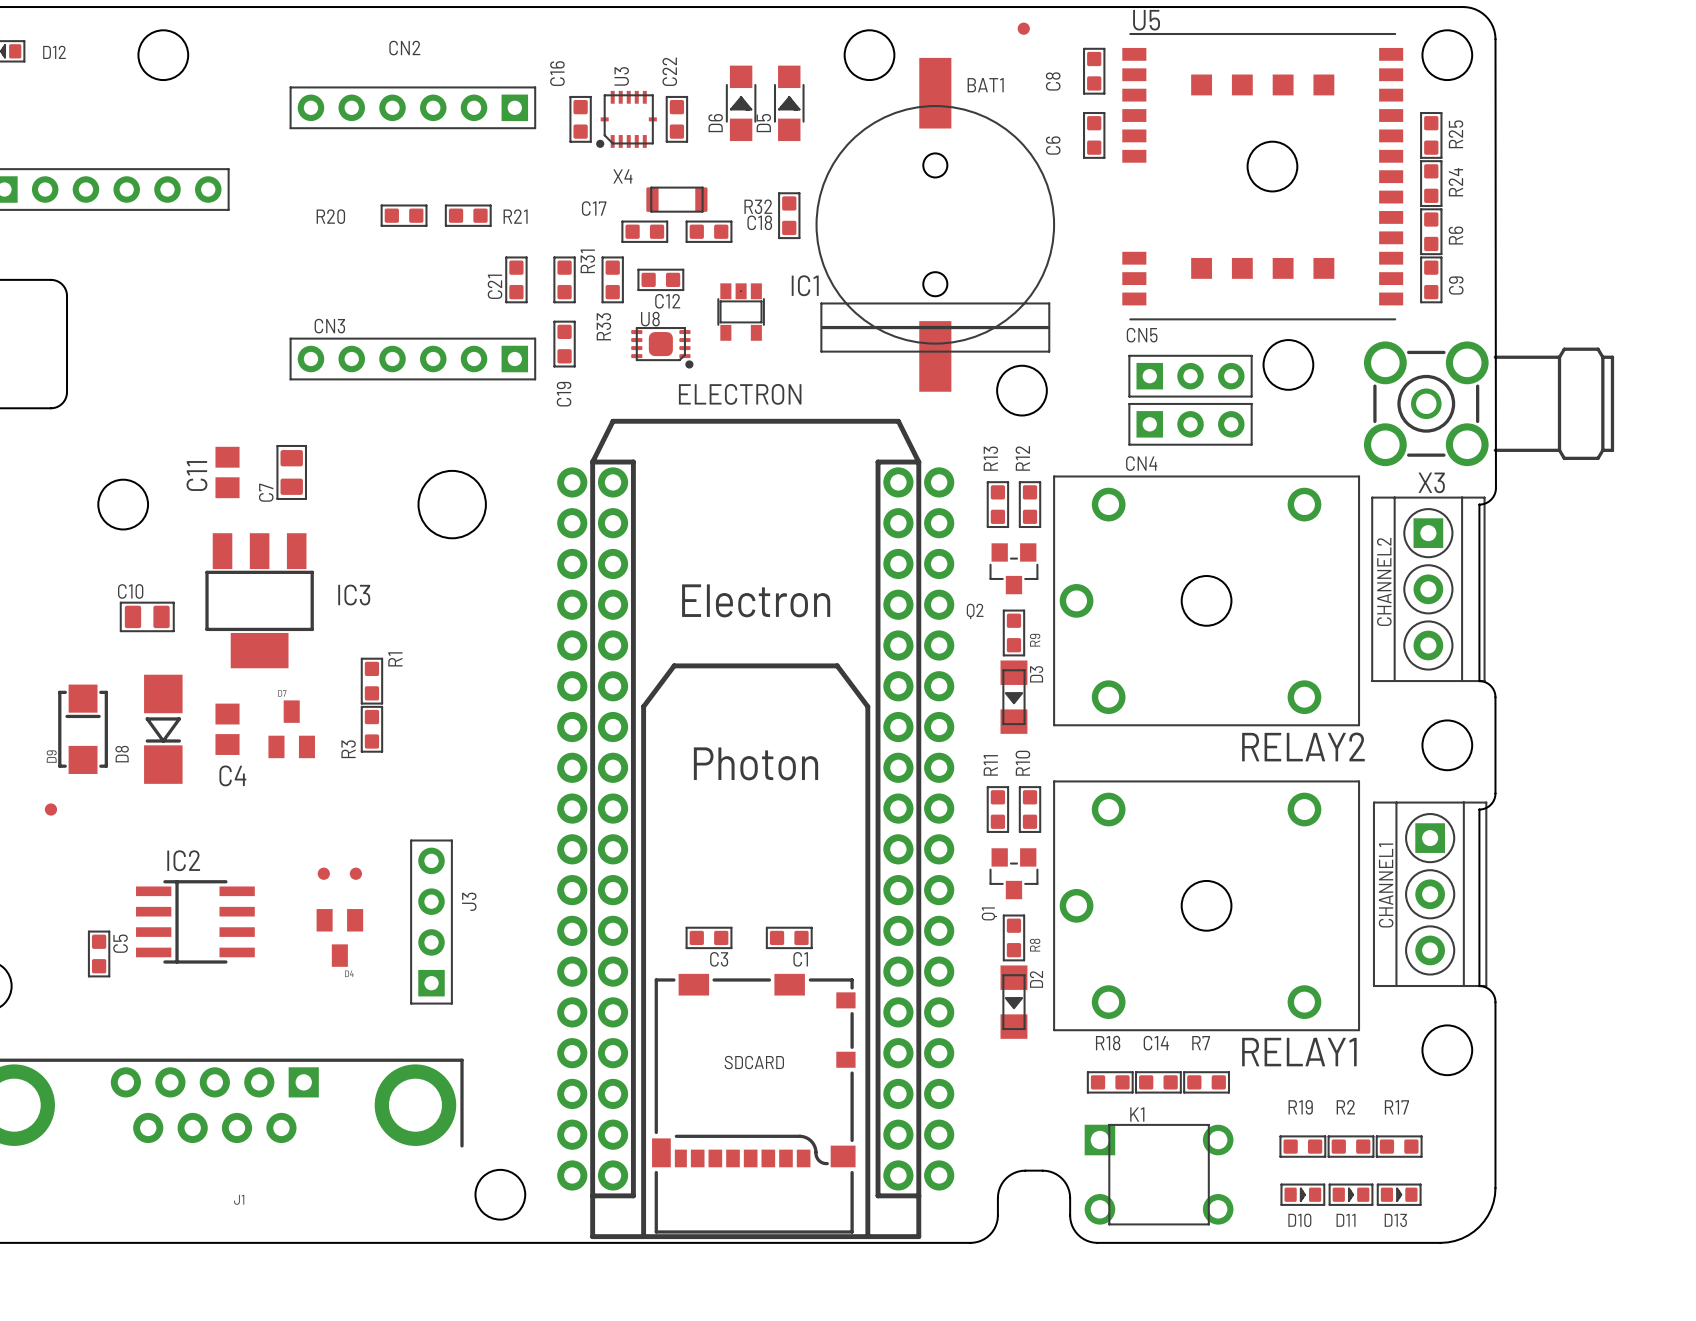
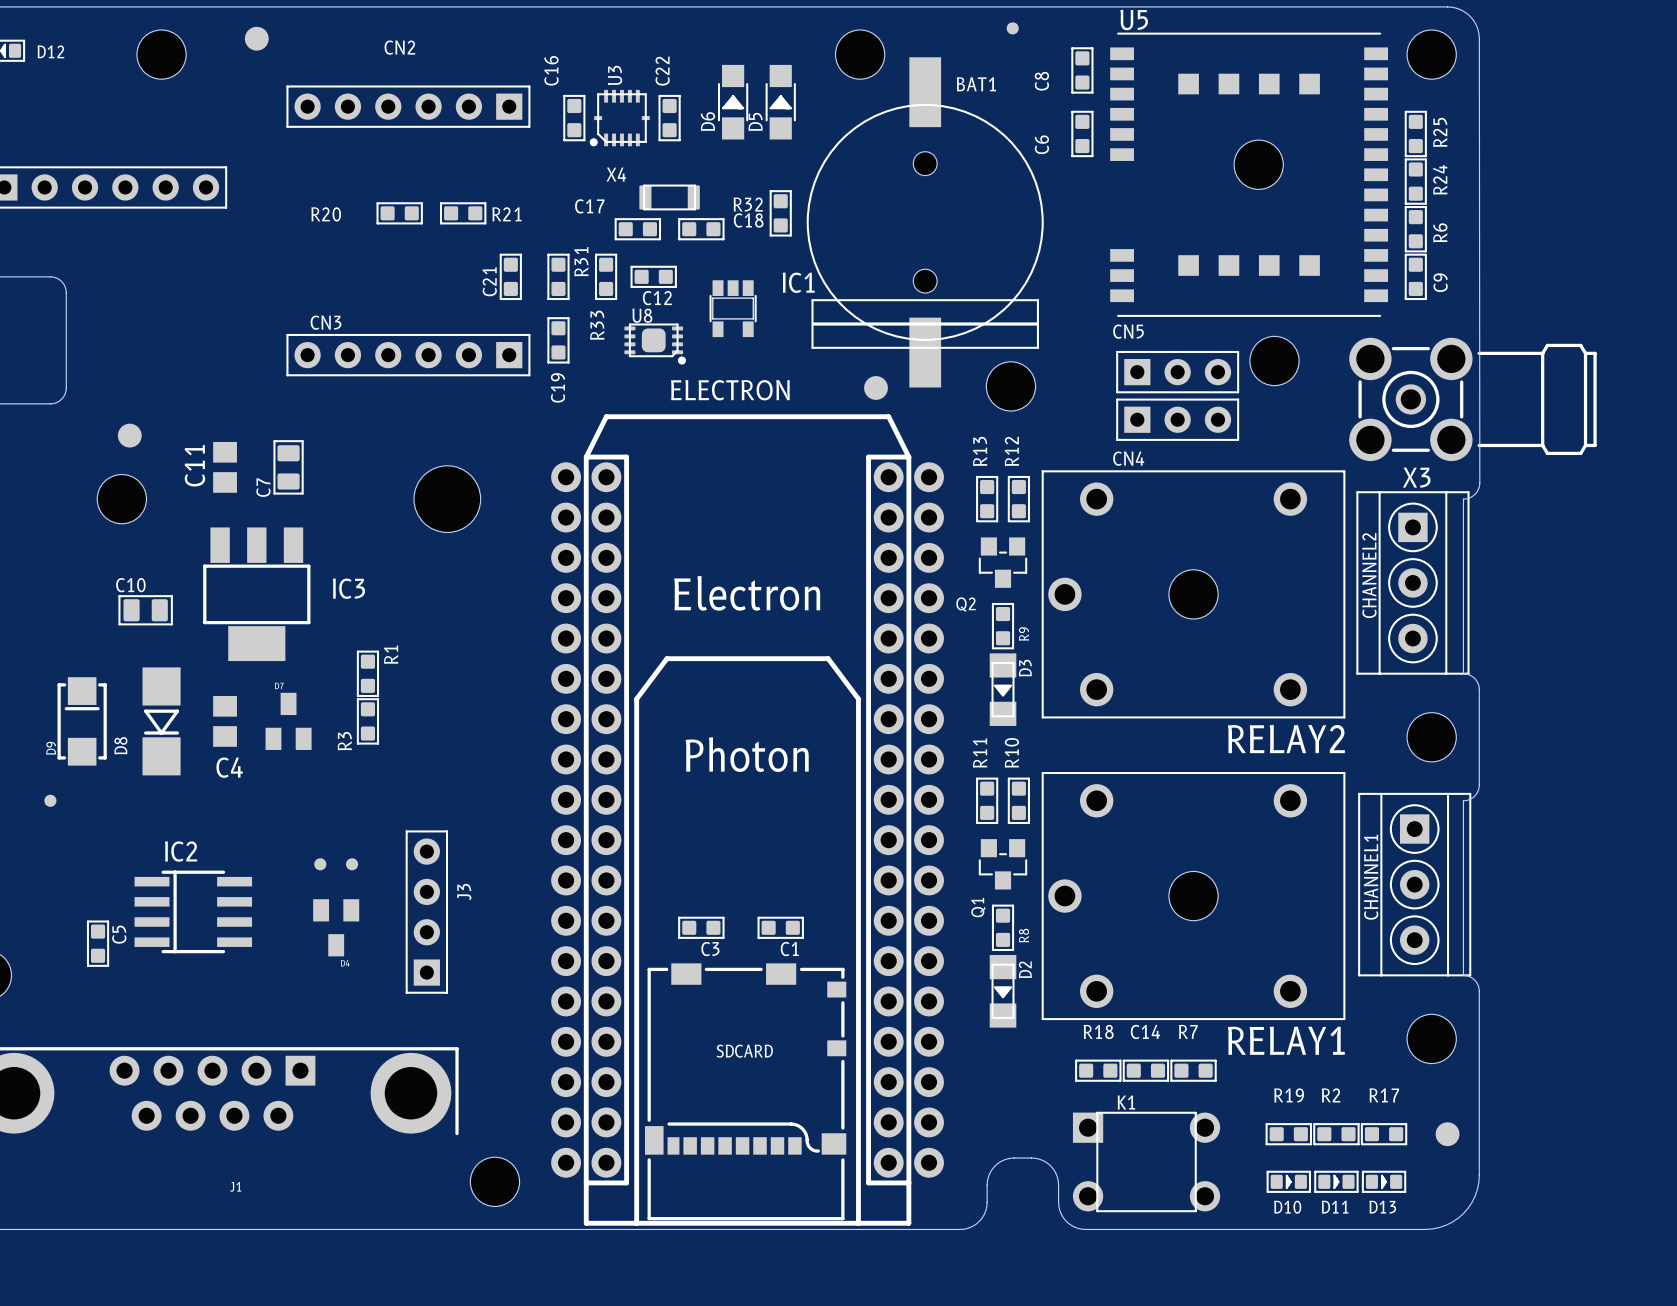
part: none -> (256, 38)
part: none -> (876, 387)
part: none -> (129, 435)
part: none -> (1447, 1134)

